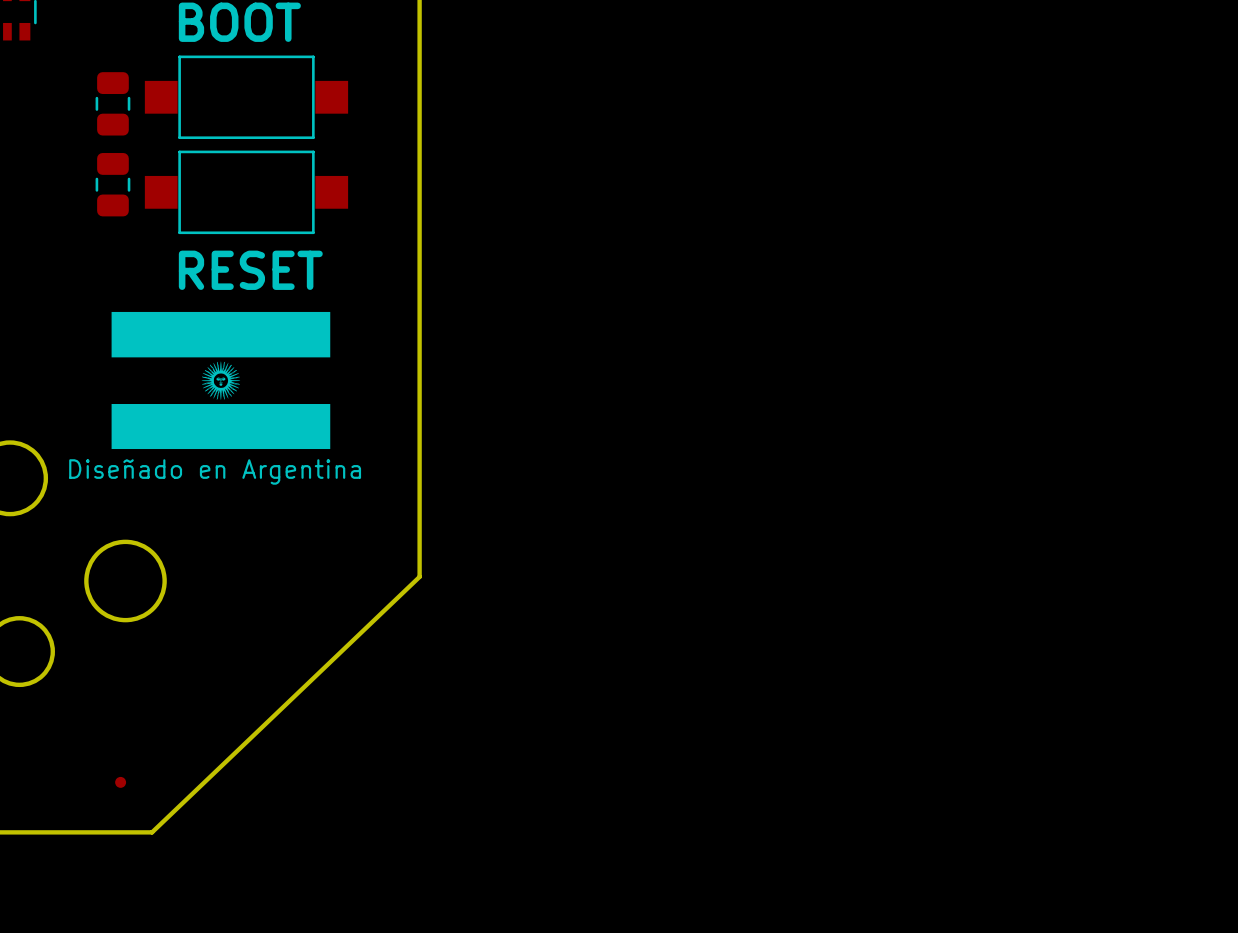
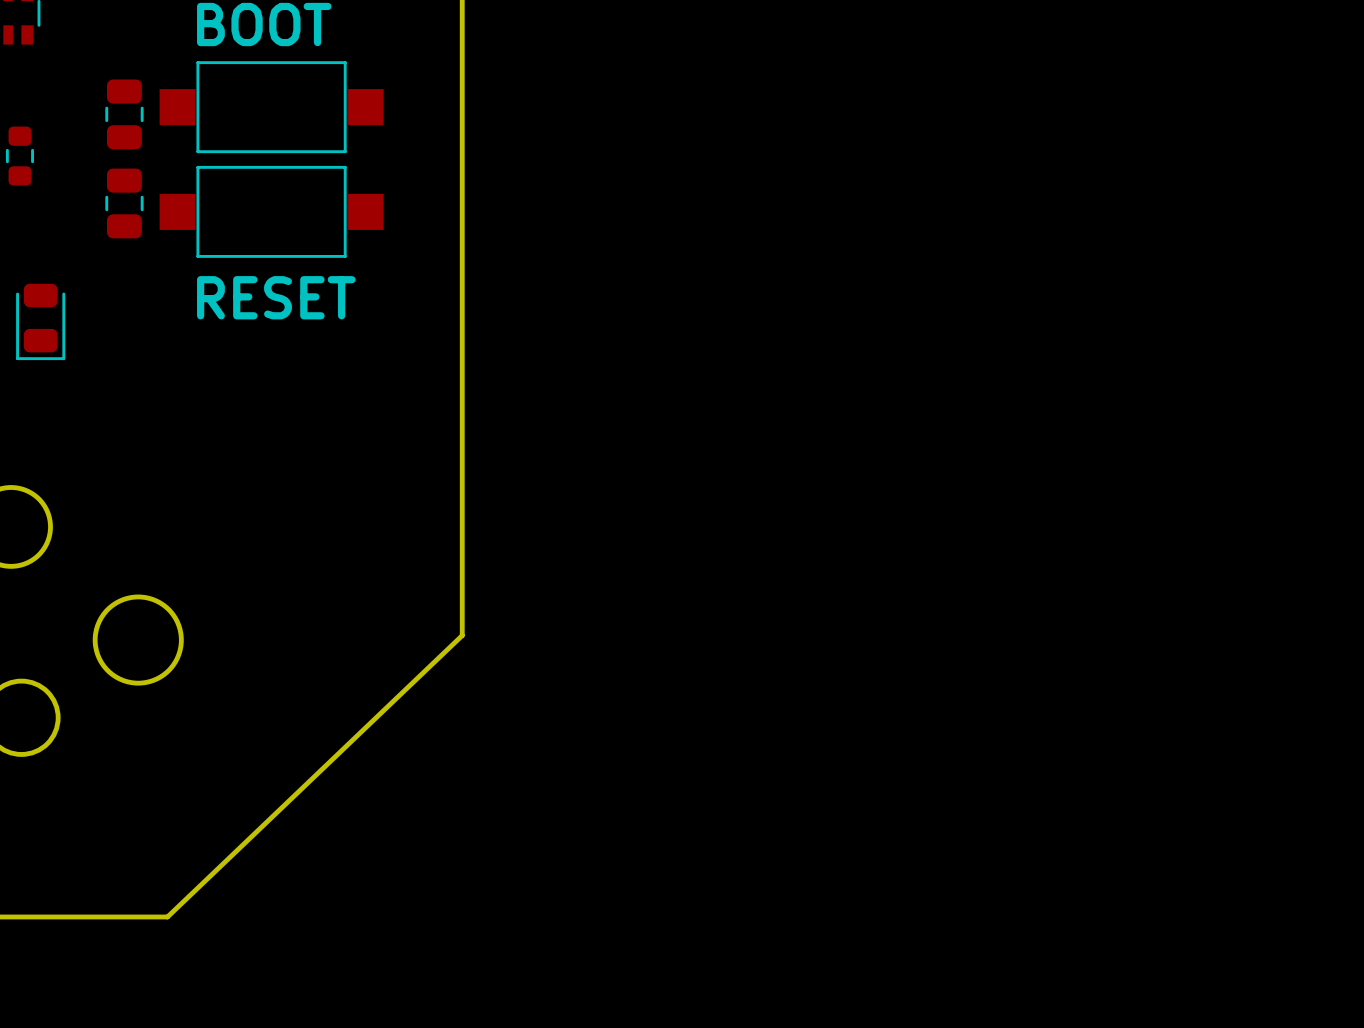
part: none -> (19, 156)
part: none -> (40, 321)
drawing: [111, 311, 331, 450] -> none
text: Diseñado en Argentina (215, 471) -> none
part: (120, 782) -> none

